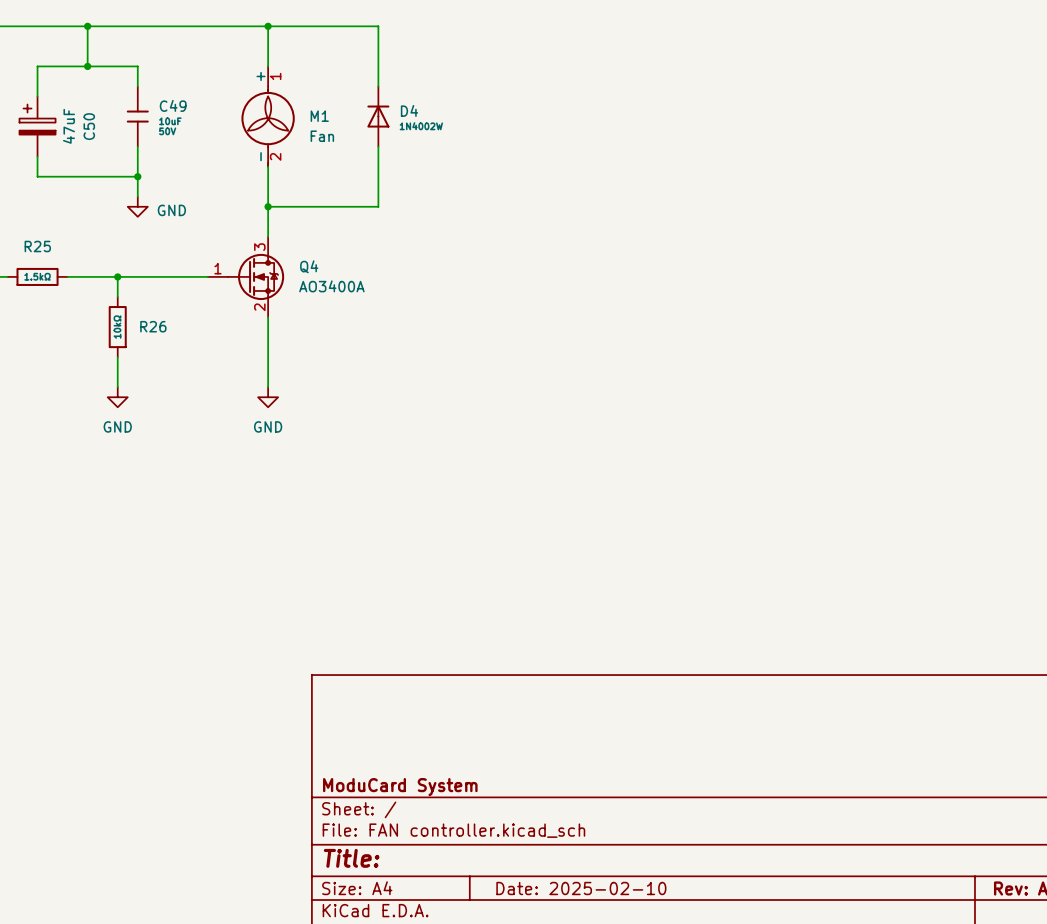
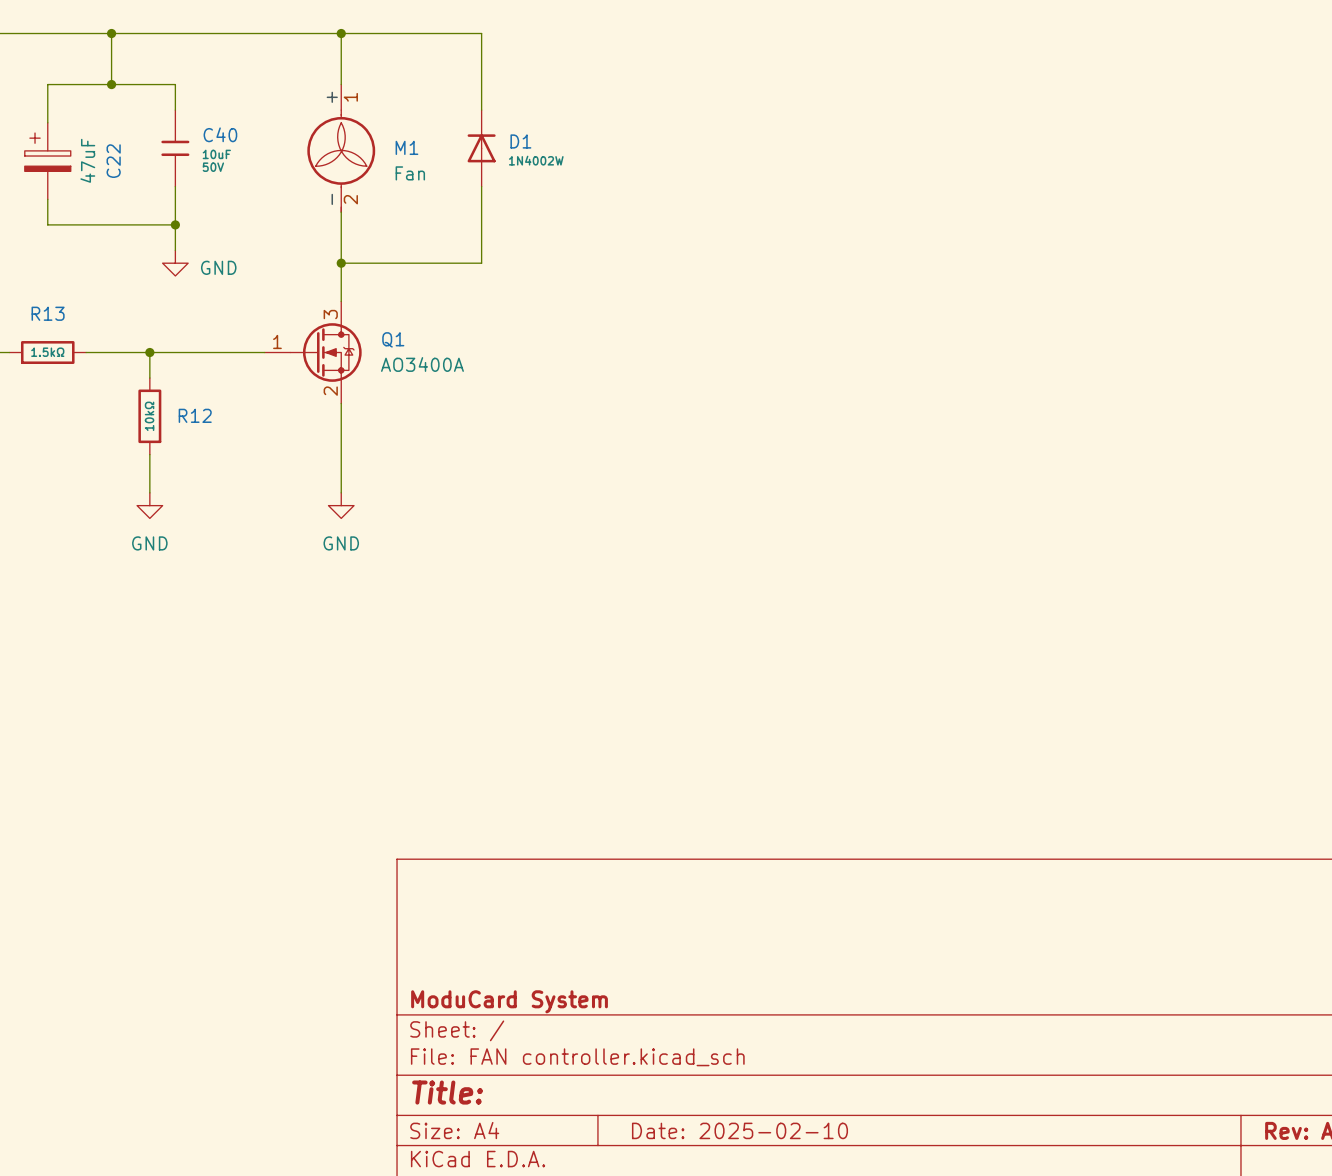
C49 name: C49 (173, 105) -> C40 (220, 134)
D4 name: D4 (409, 110) -> D1 (520, 141)
C50 name: C50 (89, 126) -> C22 (113, 161)
R25 name: R25 (37, 246) -> R13 (48, 313)
Q4 name: Q4 (309, 266) -> Q1 (393, 339)
R26 name: R26 (153, 326) -> R12 (195, 415)

